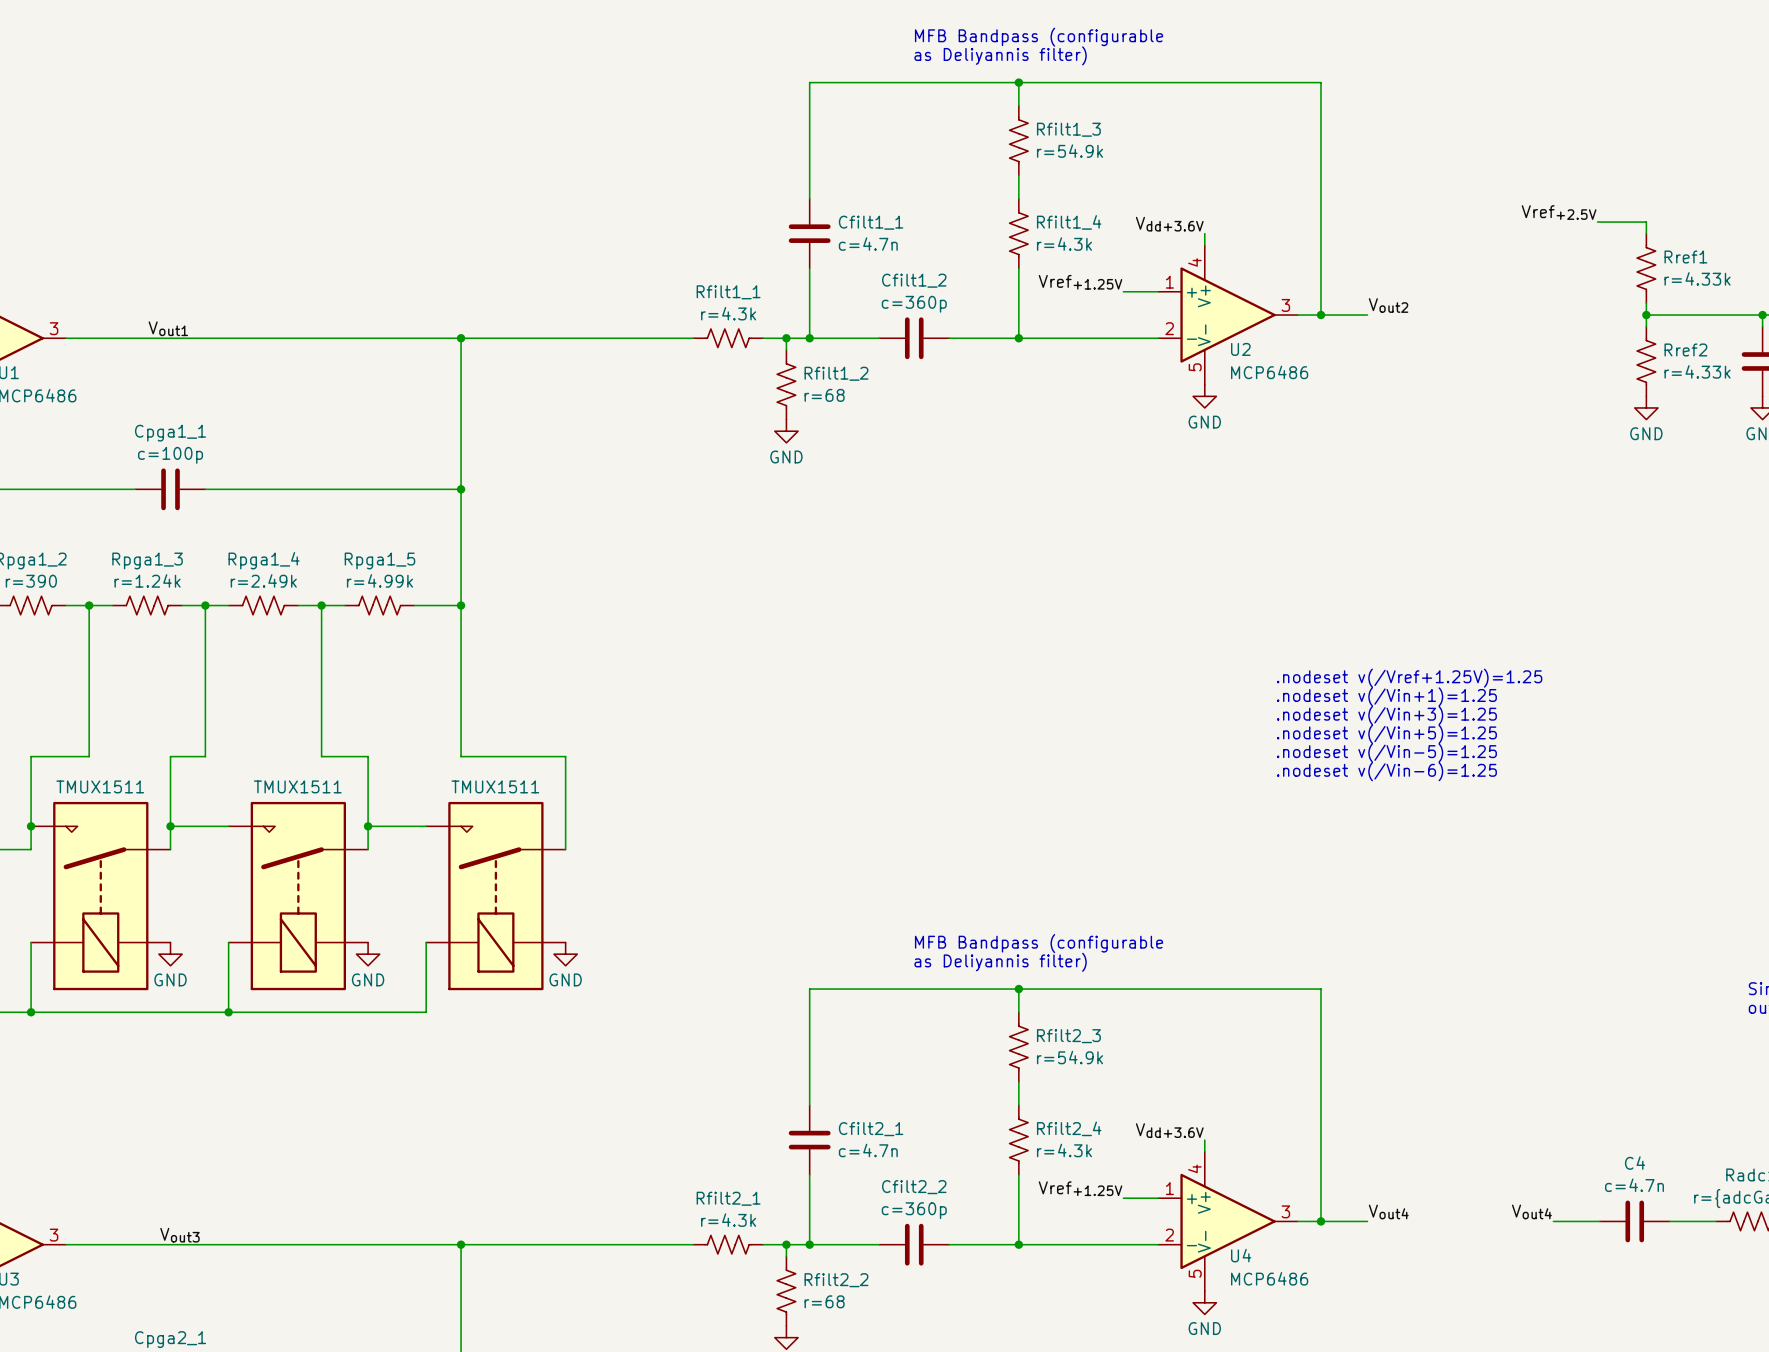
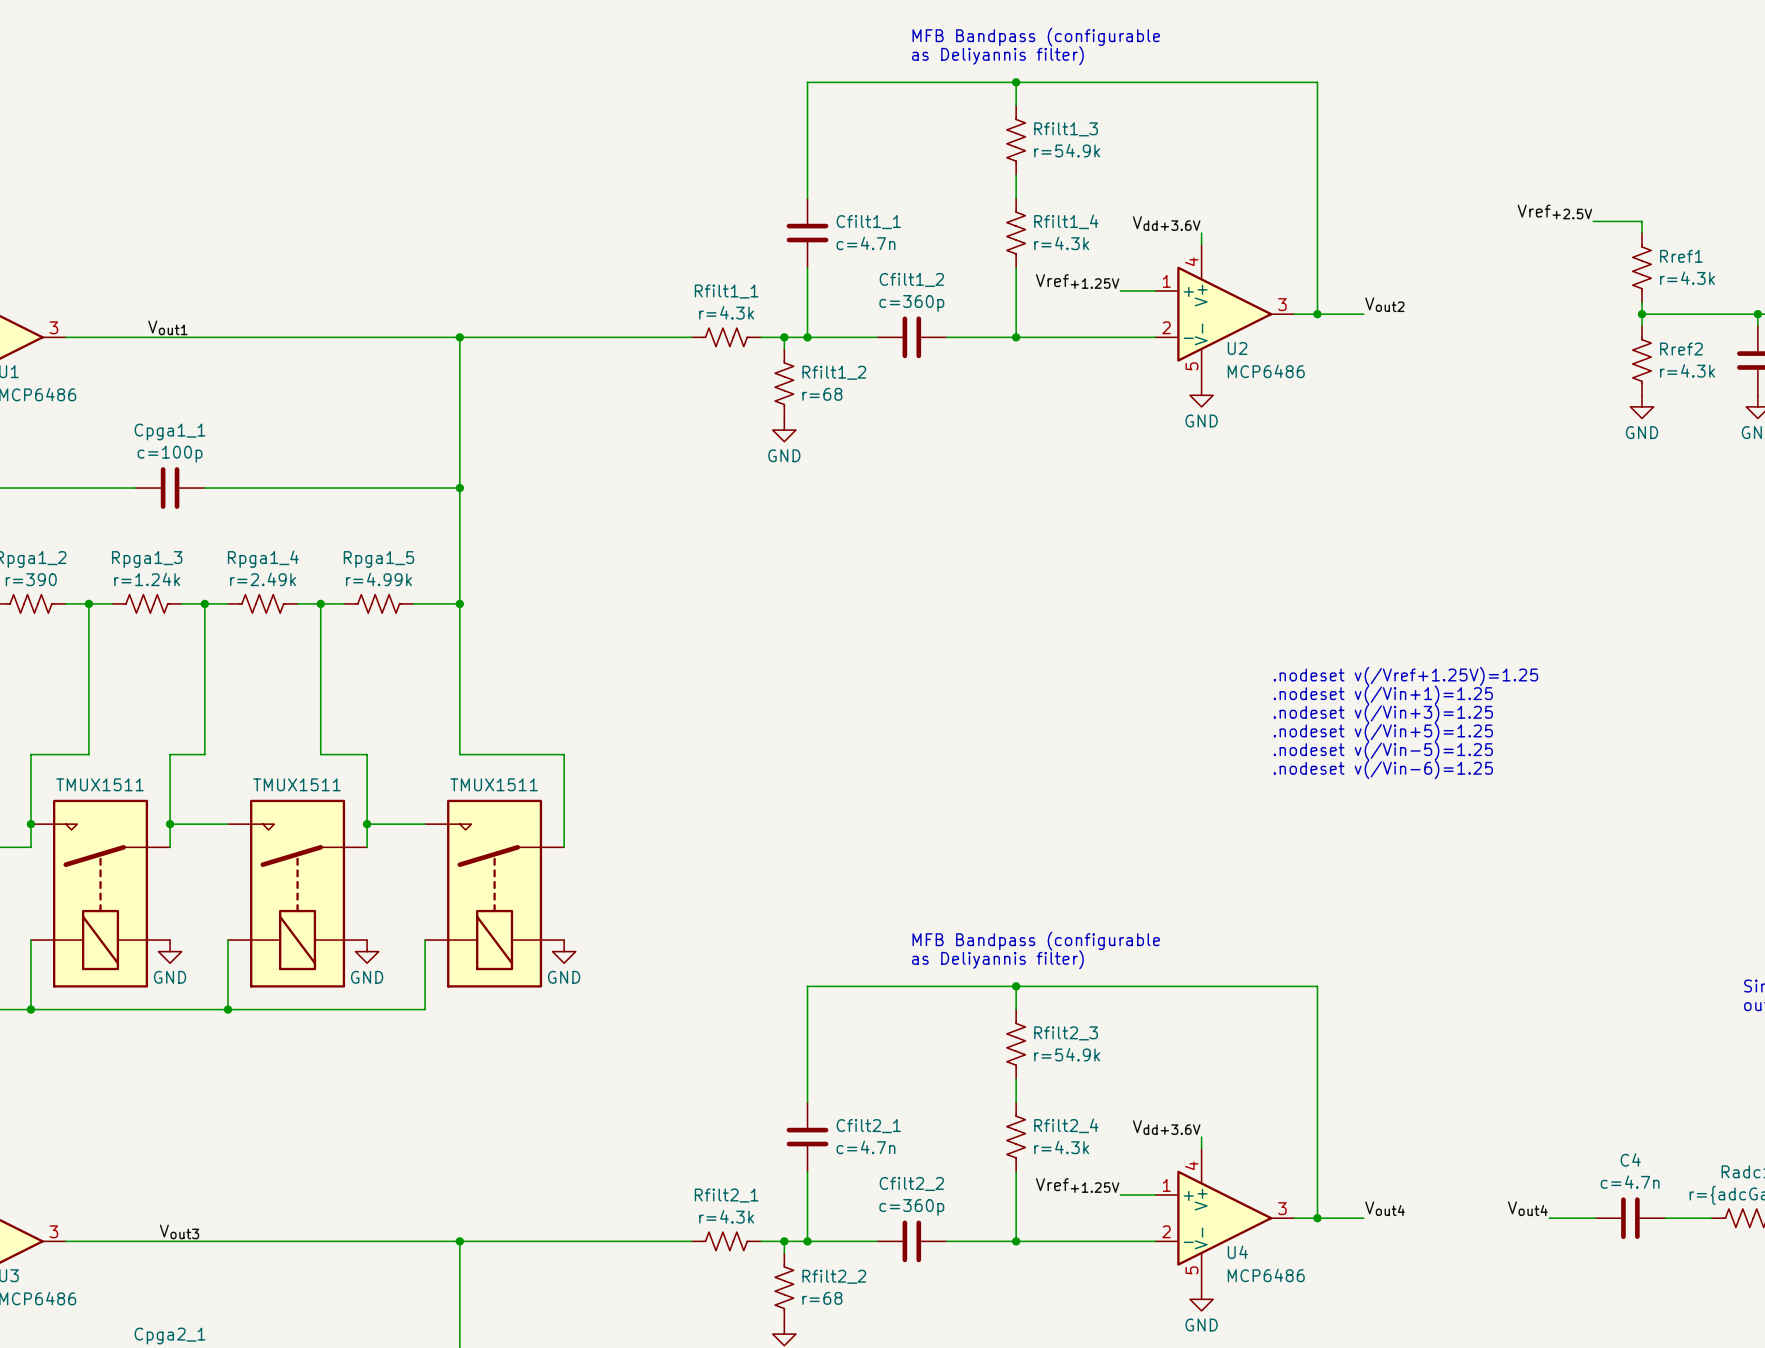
Rref1 value: r=4.33k (1697, 278) -> r=4.3k (1687, 278)
Rref2 value: r=4.33k (1697, 371) -> r=4.3k (1687, 370)

